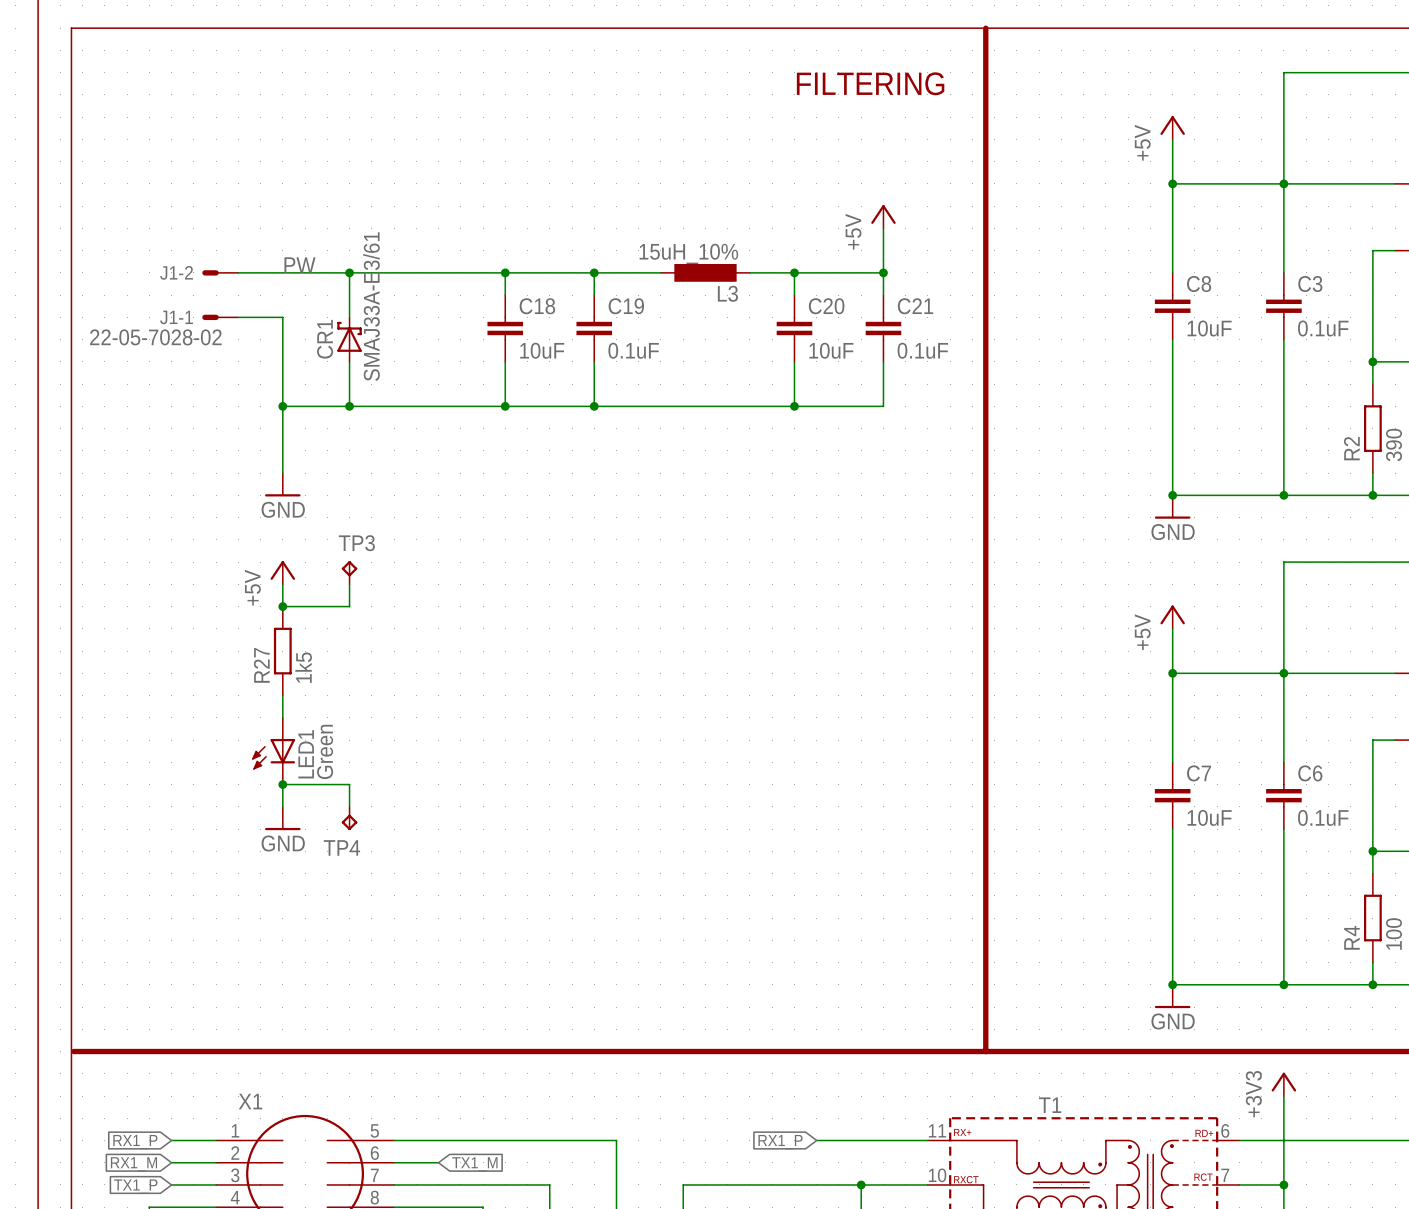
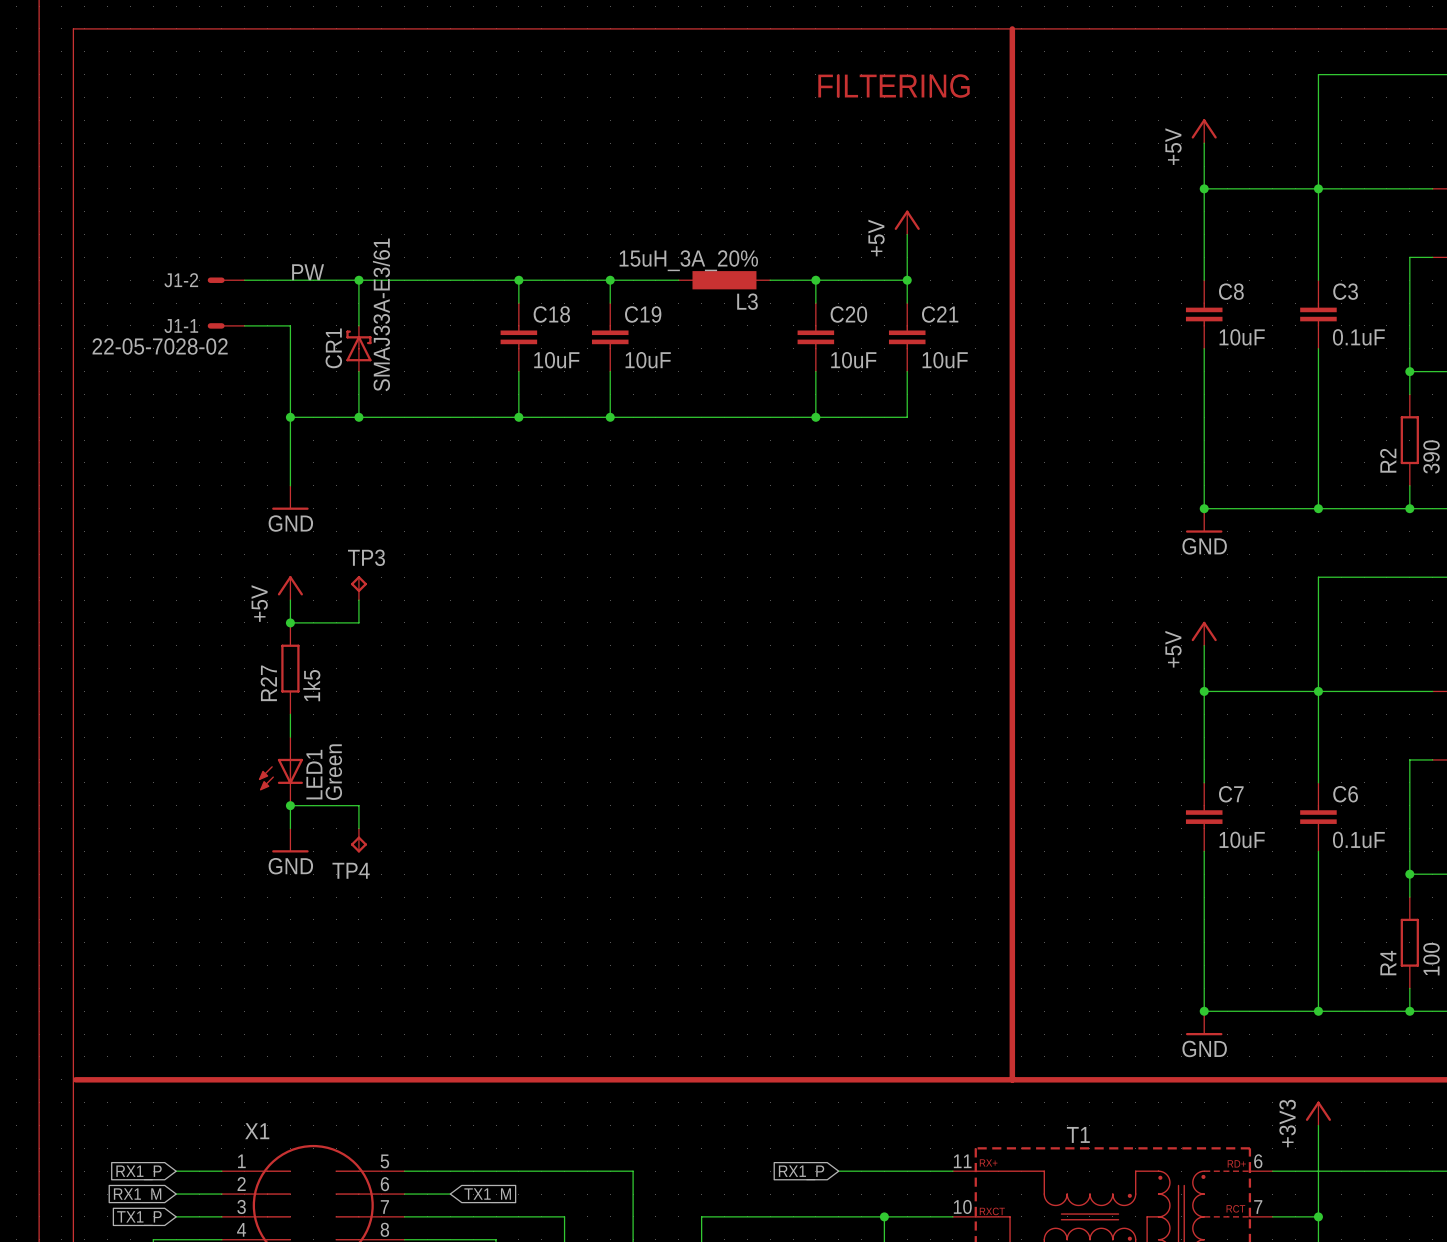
L3 value: 15uH_10% (688, 253) -> 15uH_3A_20% (688, 260)
C19 value: 0.1uF (633, 350) -> 10uF (648, 360)
C21 value: 0.1uF (922, 350) -> 10uF (945, 360)

